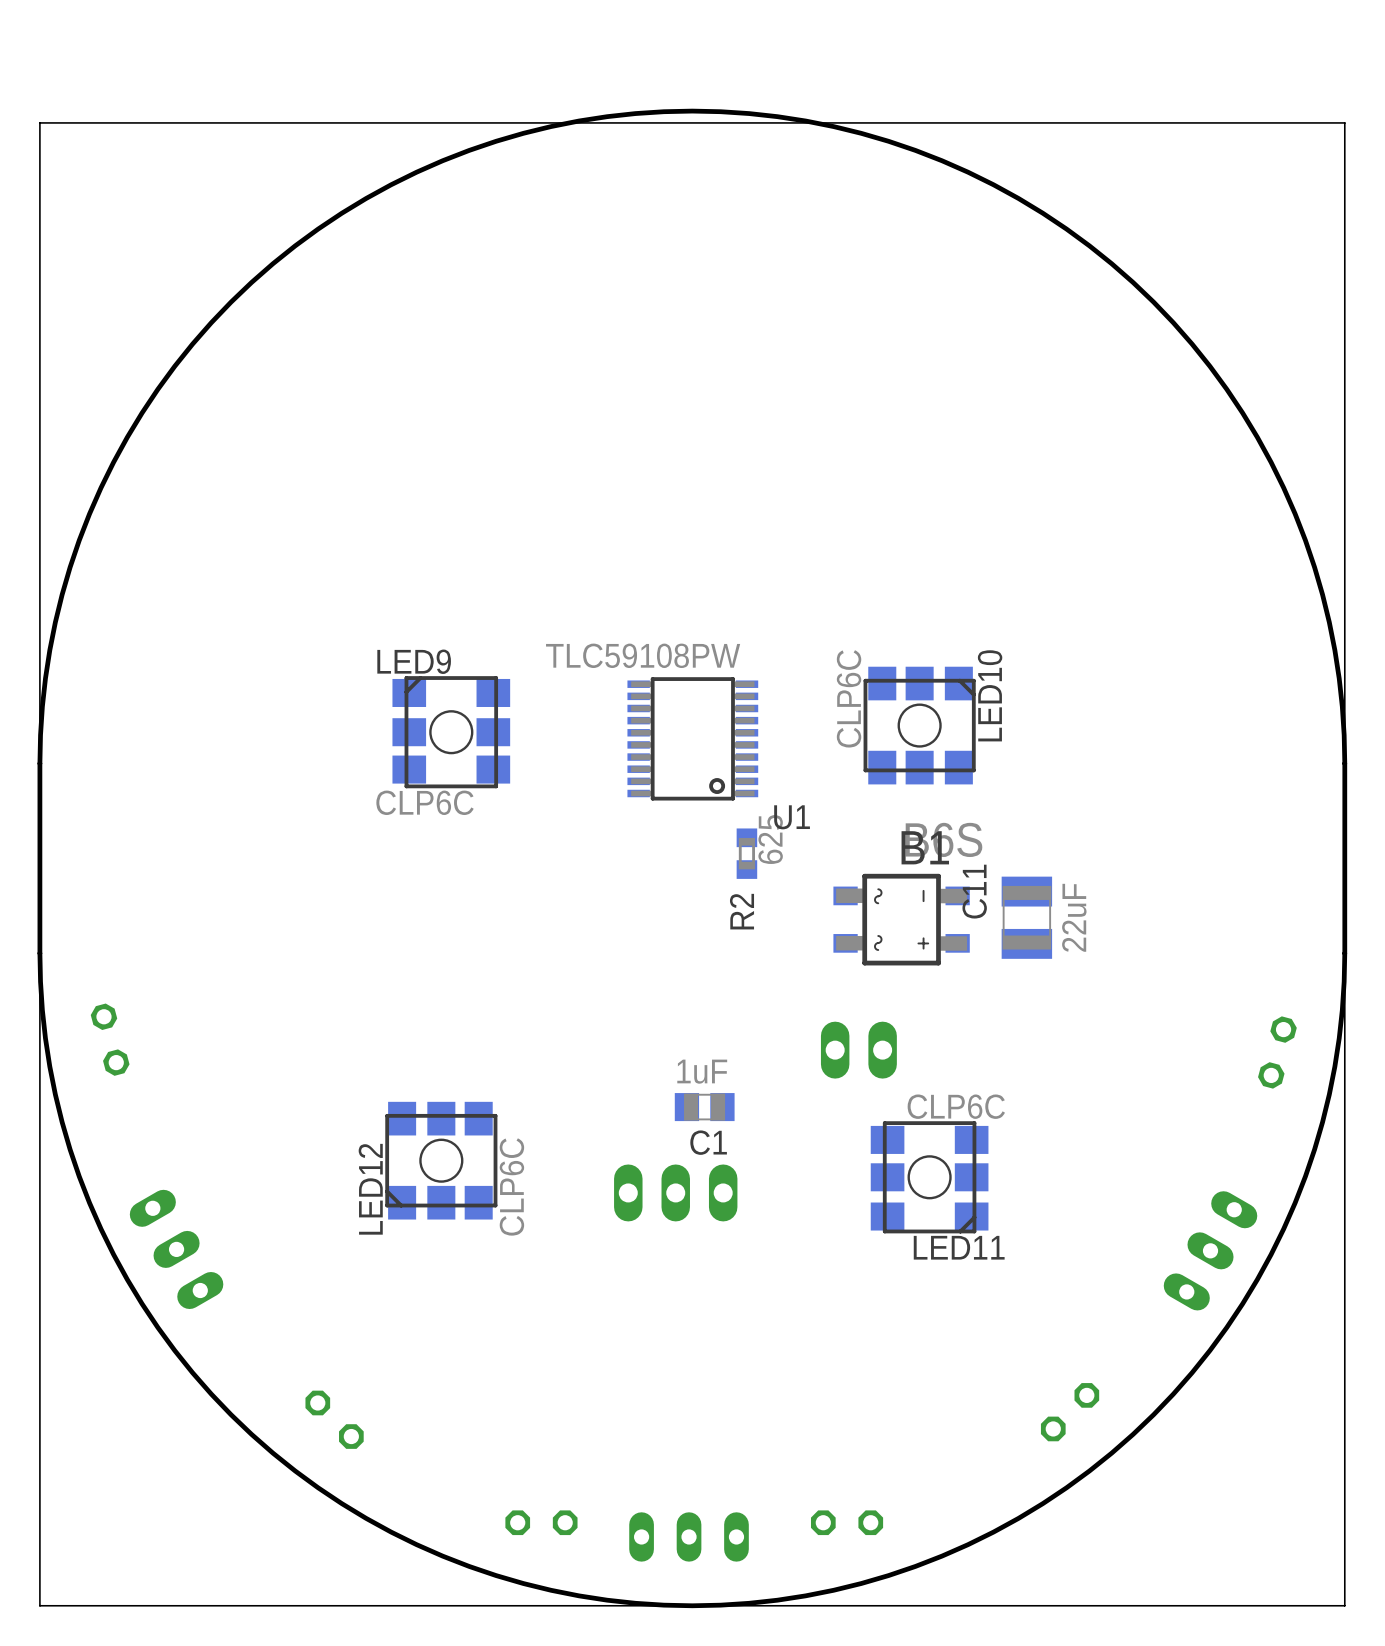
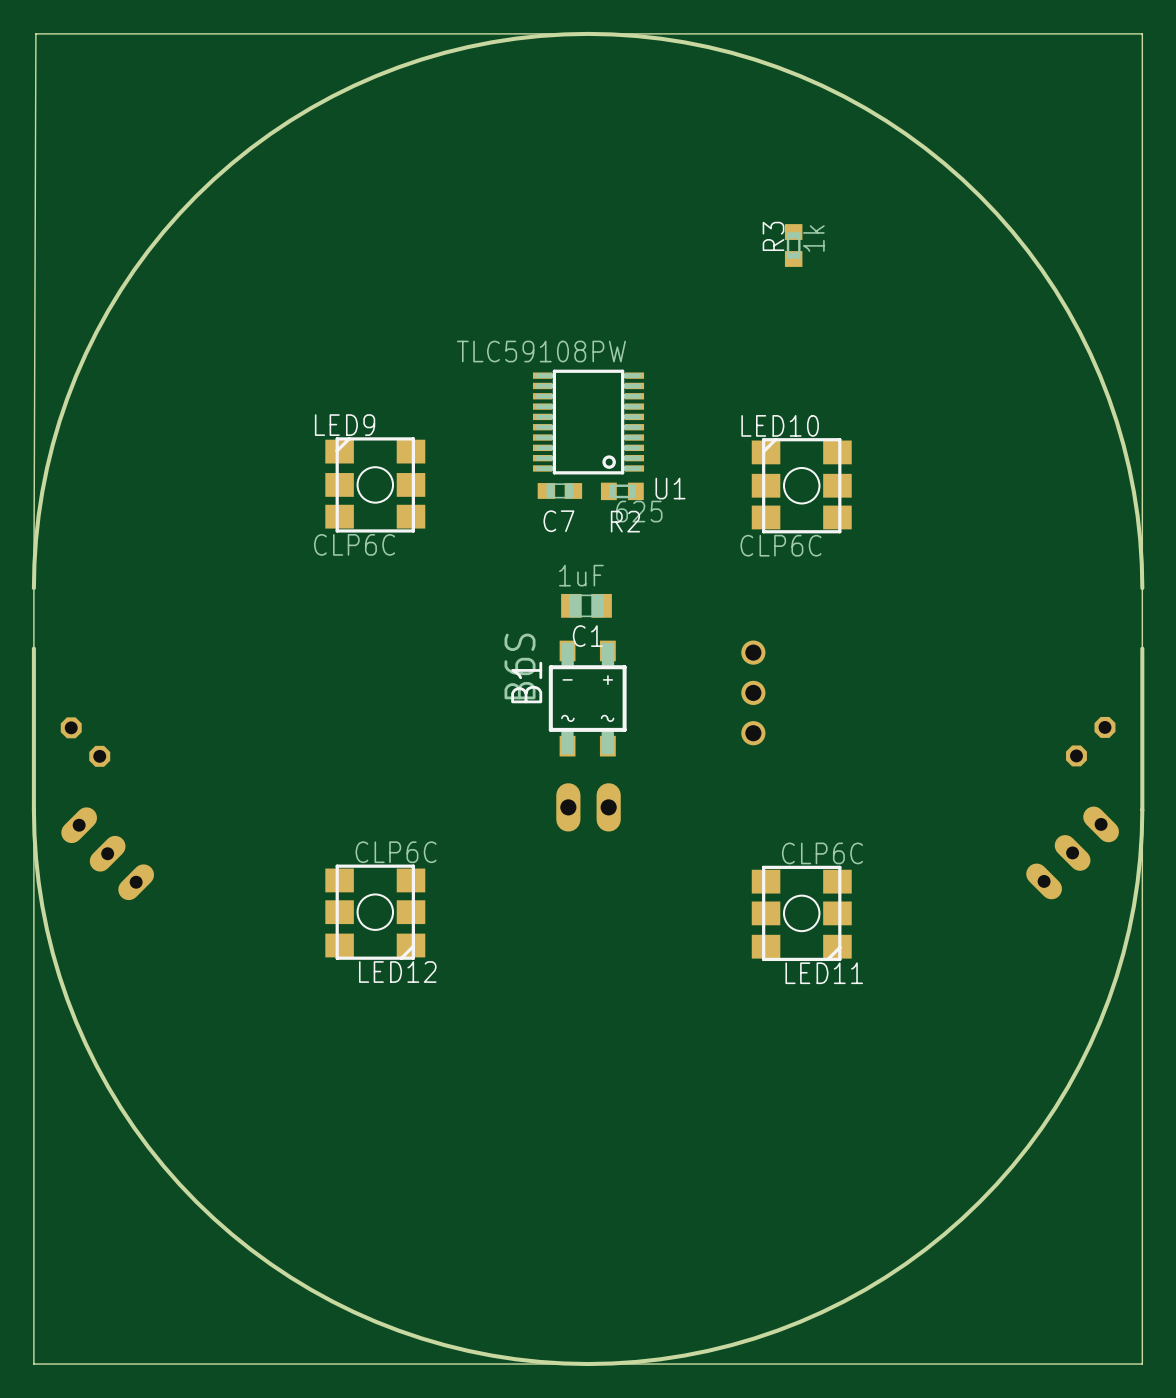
board edge: (1344, 122) (39, 122) (39, 692) -> (1142, 104) (1142, 33) (35, 33) (33, 588) (36, 539) (42, 491) (52, 444) (76, 376) (96, 332) (134, 270) (163, 231) (196, 196) (231, 163) (270, 134) (332, 96) (376, 76) (444, 52) (491, 42) (539, 36) (563, 34) (588, 33) (612, 34) (636, 36) (684, 42) (731, 52) (800, 76) (844, 96) (906, 134) (944, 163) (980, 196) (1012, 231) (1042, 270) (1079, 332) (1100, 376) (1123, 444) (1133, 491) (1140, 539) (1142, 588)
R3: none -> 1k (793, 245)
C7: none -> (559, 490)
LED10 rotation: 0° (919, 725) -> 90° counterclockwise (801, 485)
LED10 position: (919, 725) -> (801, 485)
LED9 position: (451, 732) -> (375, 484)
U1 position: (692, 738) -> (588, 422)
board edge: (1344, 763) (1342, 706) (1334, 650) (1322, 594) (1295, 513) (1271, 462) (1226, 389) (1192, 344) (1153, 302) (1111, 263) (1066, 229) (993, 184) (942, 160) (861, 133) (805, 120) (749, 113) (692, 111) (635, 113) (579, 120) (523, 133) (442, 160) (391, 184) (318, 229) (272, 263) (231, 302) (192, 344) (157, 389) (113, 462) (89, 513) (62, 594) (49, 650) (42, 706) (39, 763) -> none
part: none -> (753, 692)
R2 rotation: 0° (746, 853) -> 90° clockwise (622, 491)
R2 position: (746, 853) -> (622, 491)
part: none -> (85, 742)
part: none -> (1090, 741)
C11: 22uF (1026, 917) -> none
B1 rotation: 0° (901, 919) -> 90° counterclockwise (587, 698)
B1 position: (901, 919) -> (587, 698)
part: none -> (1072, 852)
part: none -> (107, 853)
part: (110, 1039) -> none
part position: (858, 1050) -> (588, 807)
part: (1277, 1052) -> none
C1 position: (704, 1107) -> (586, 605)
LED12 rotation: 0° (441, 1160) -> 90° counterclockwise (375, 912)
LED12 position: (441, 1160) -> (375, 912)
LED11 position: (929, 1177) -> (801, 913)
part: (675, 1192) -> none
part: (176, 1249) -> none
part: (1210, 1250) -> none
part: (1070, 1412) -> none
part: (334, 1419) -> none
part: (541, 1522) -> none
part: (847, 1522) -> none
part: (689, 1536) -> none

